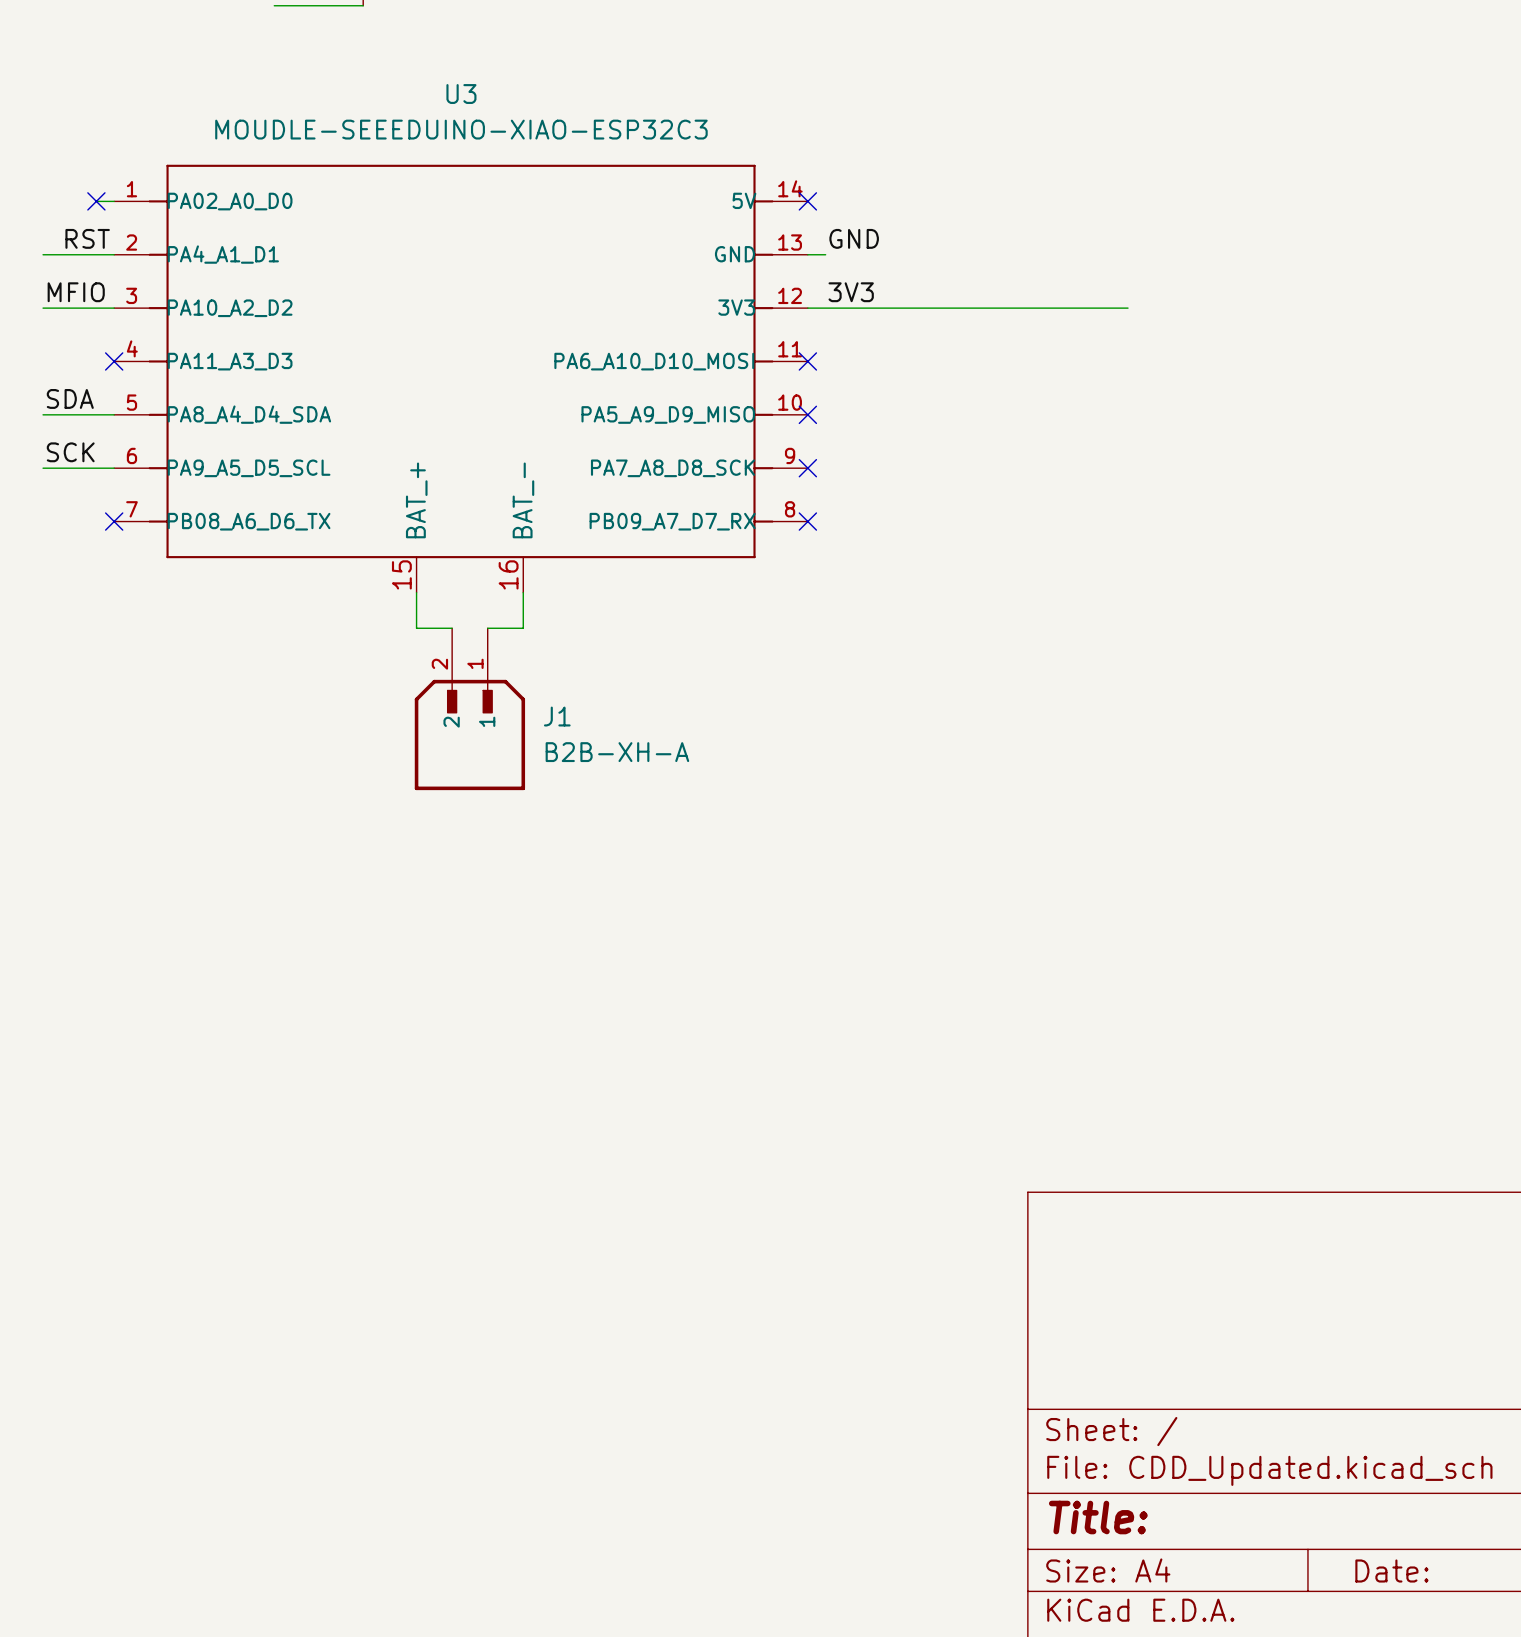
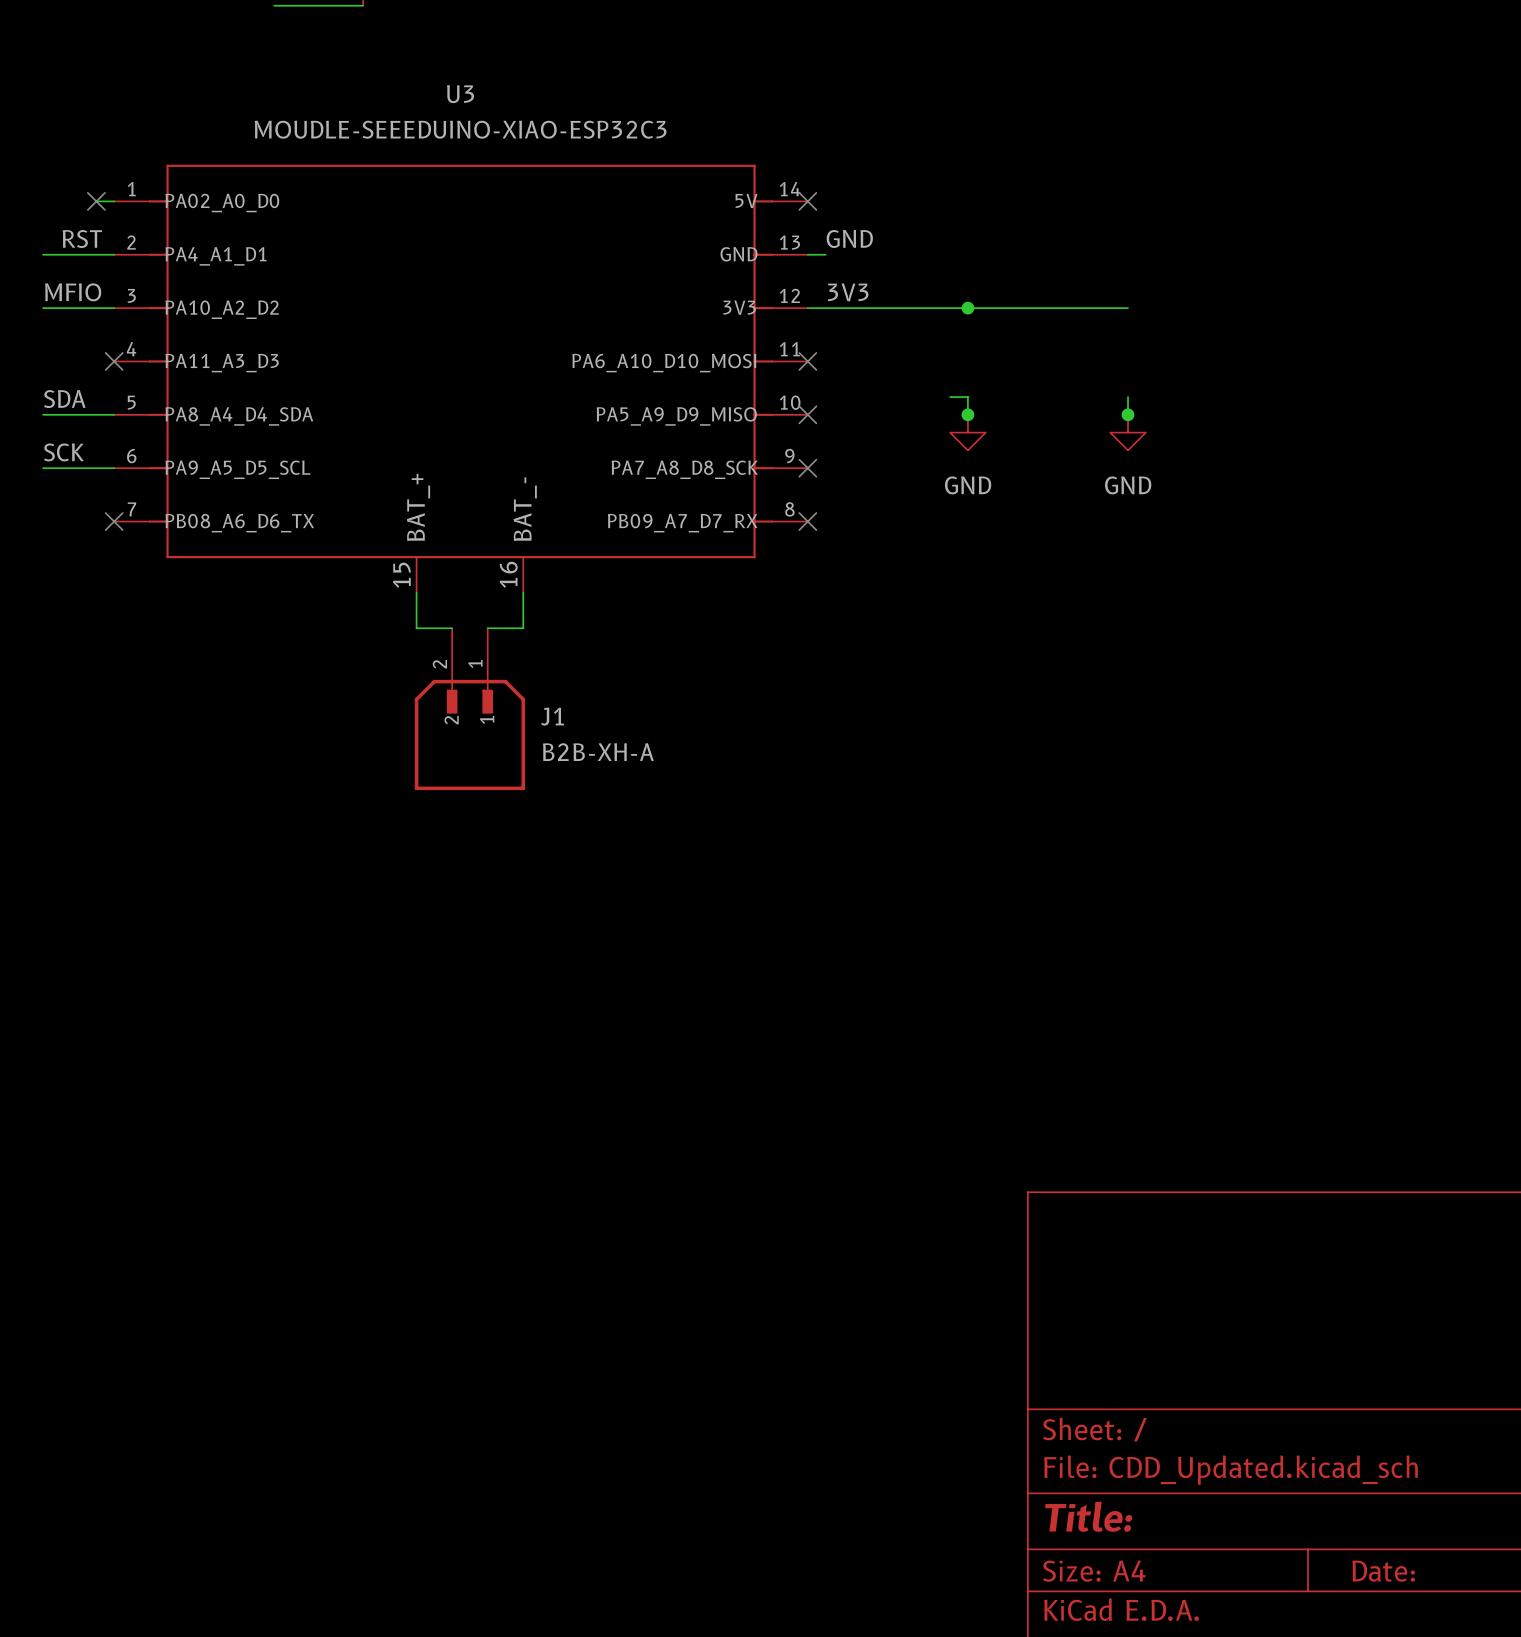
junction: none -> (967, 308)
wire: none -> (950, 397) (967, 397) (967, 414)
wire: none -> (1128, 397) (1128, 414)
junction: none -> (967, 414)
junction: none -> (1128, 414)
power symbol: none -> GND (967, 432)
power symbol: none -> GND (1128, 432)

